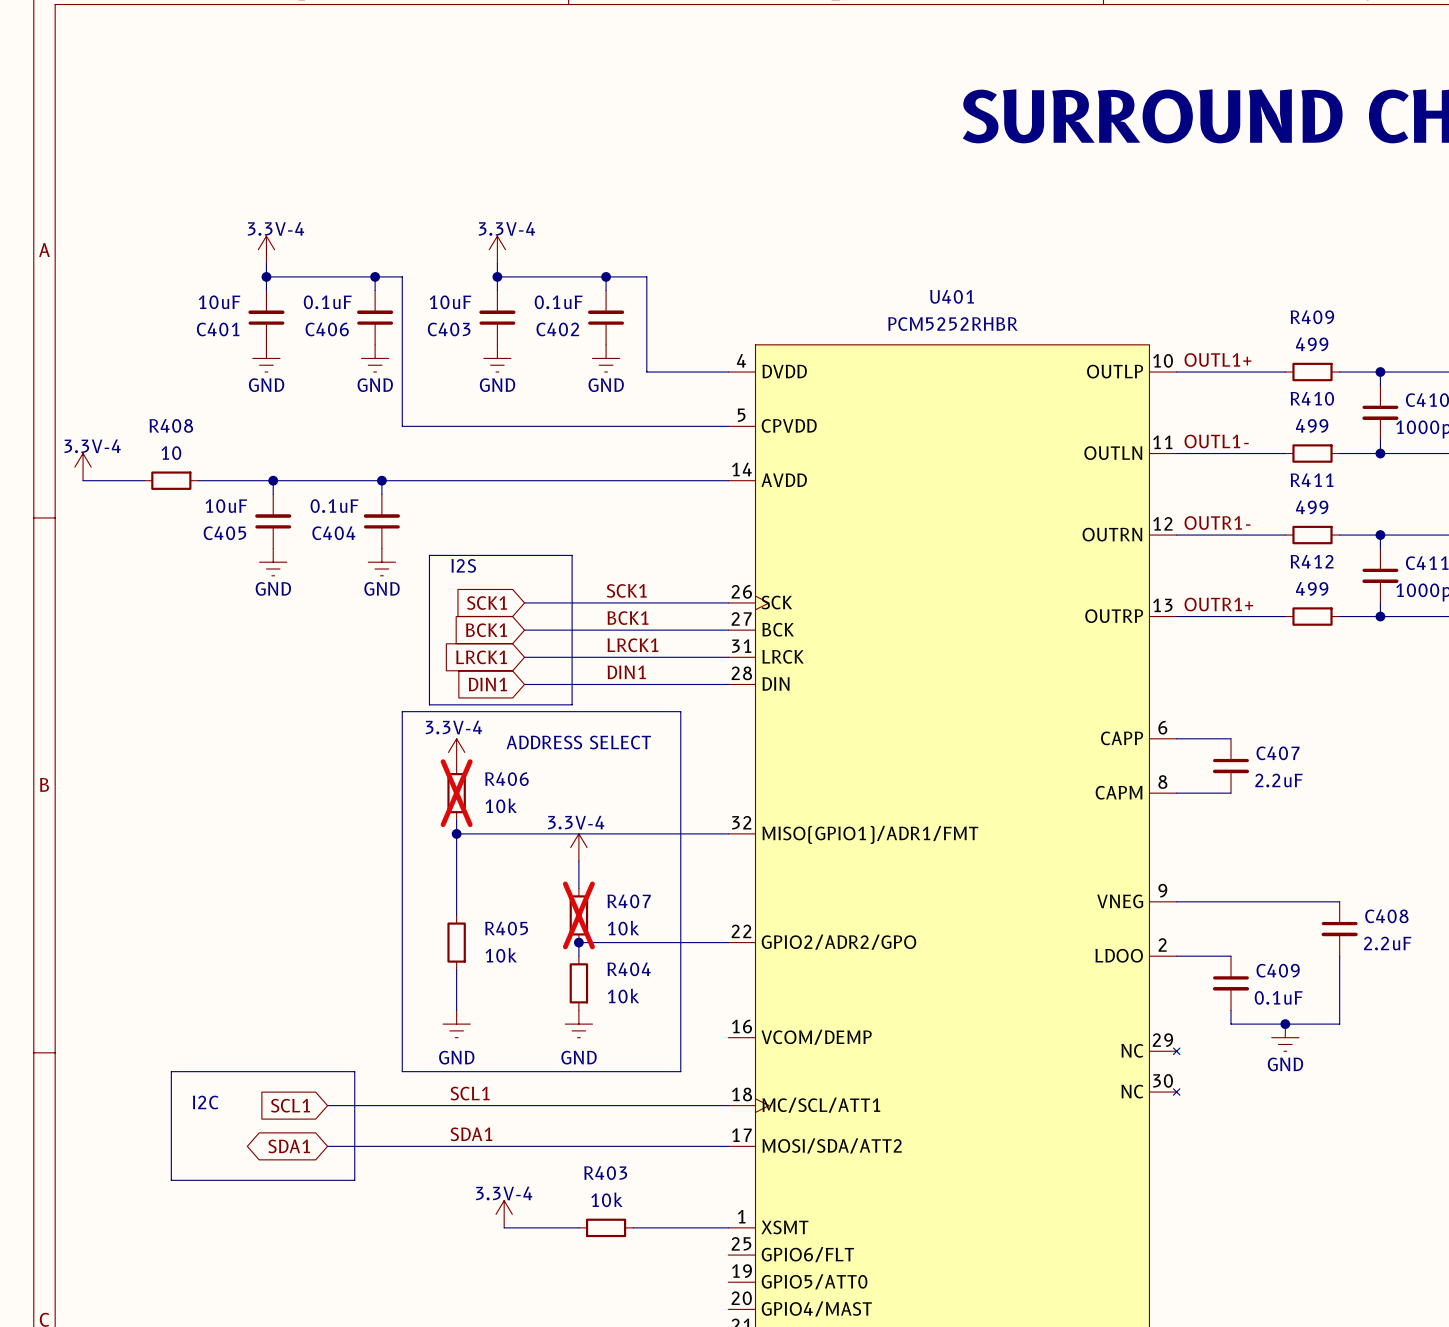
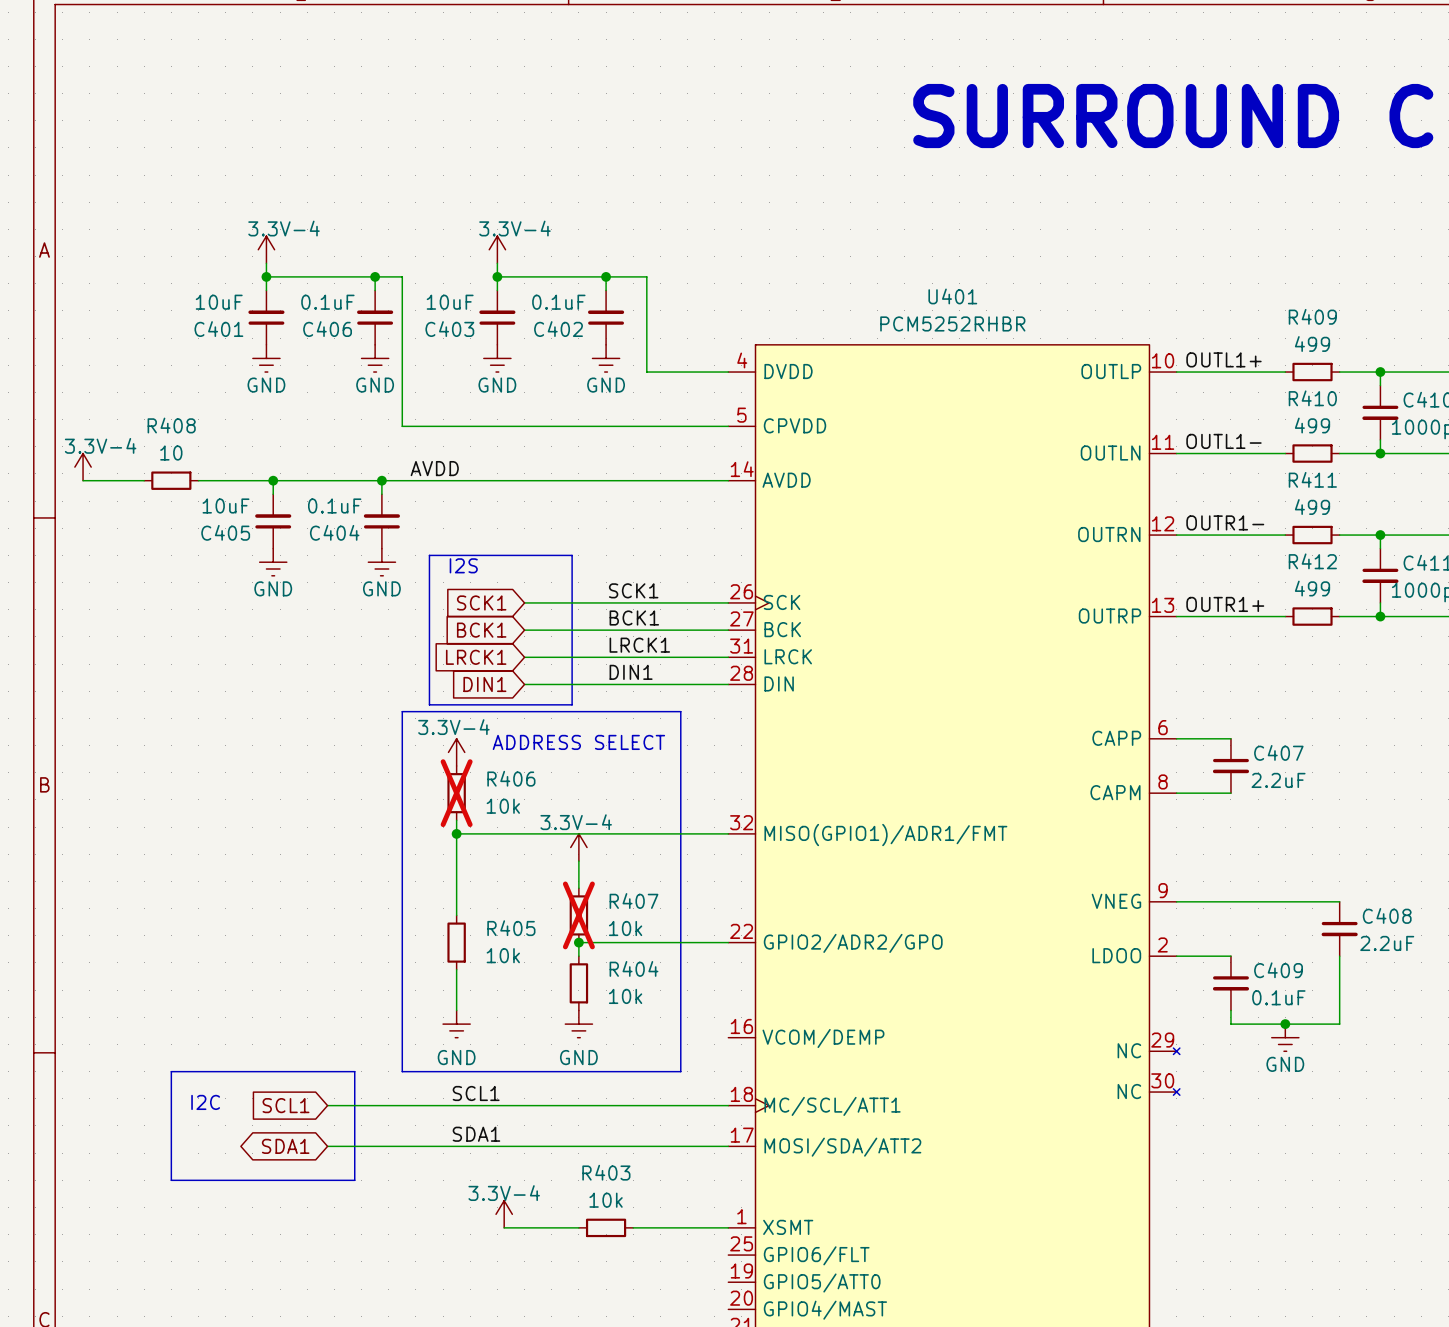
label: none -> AVDD (434, 468)

